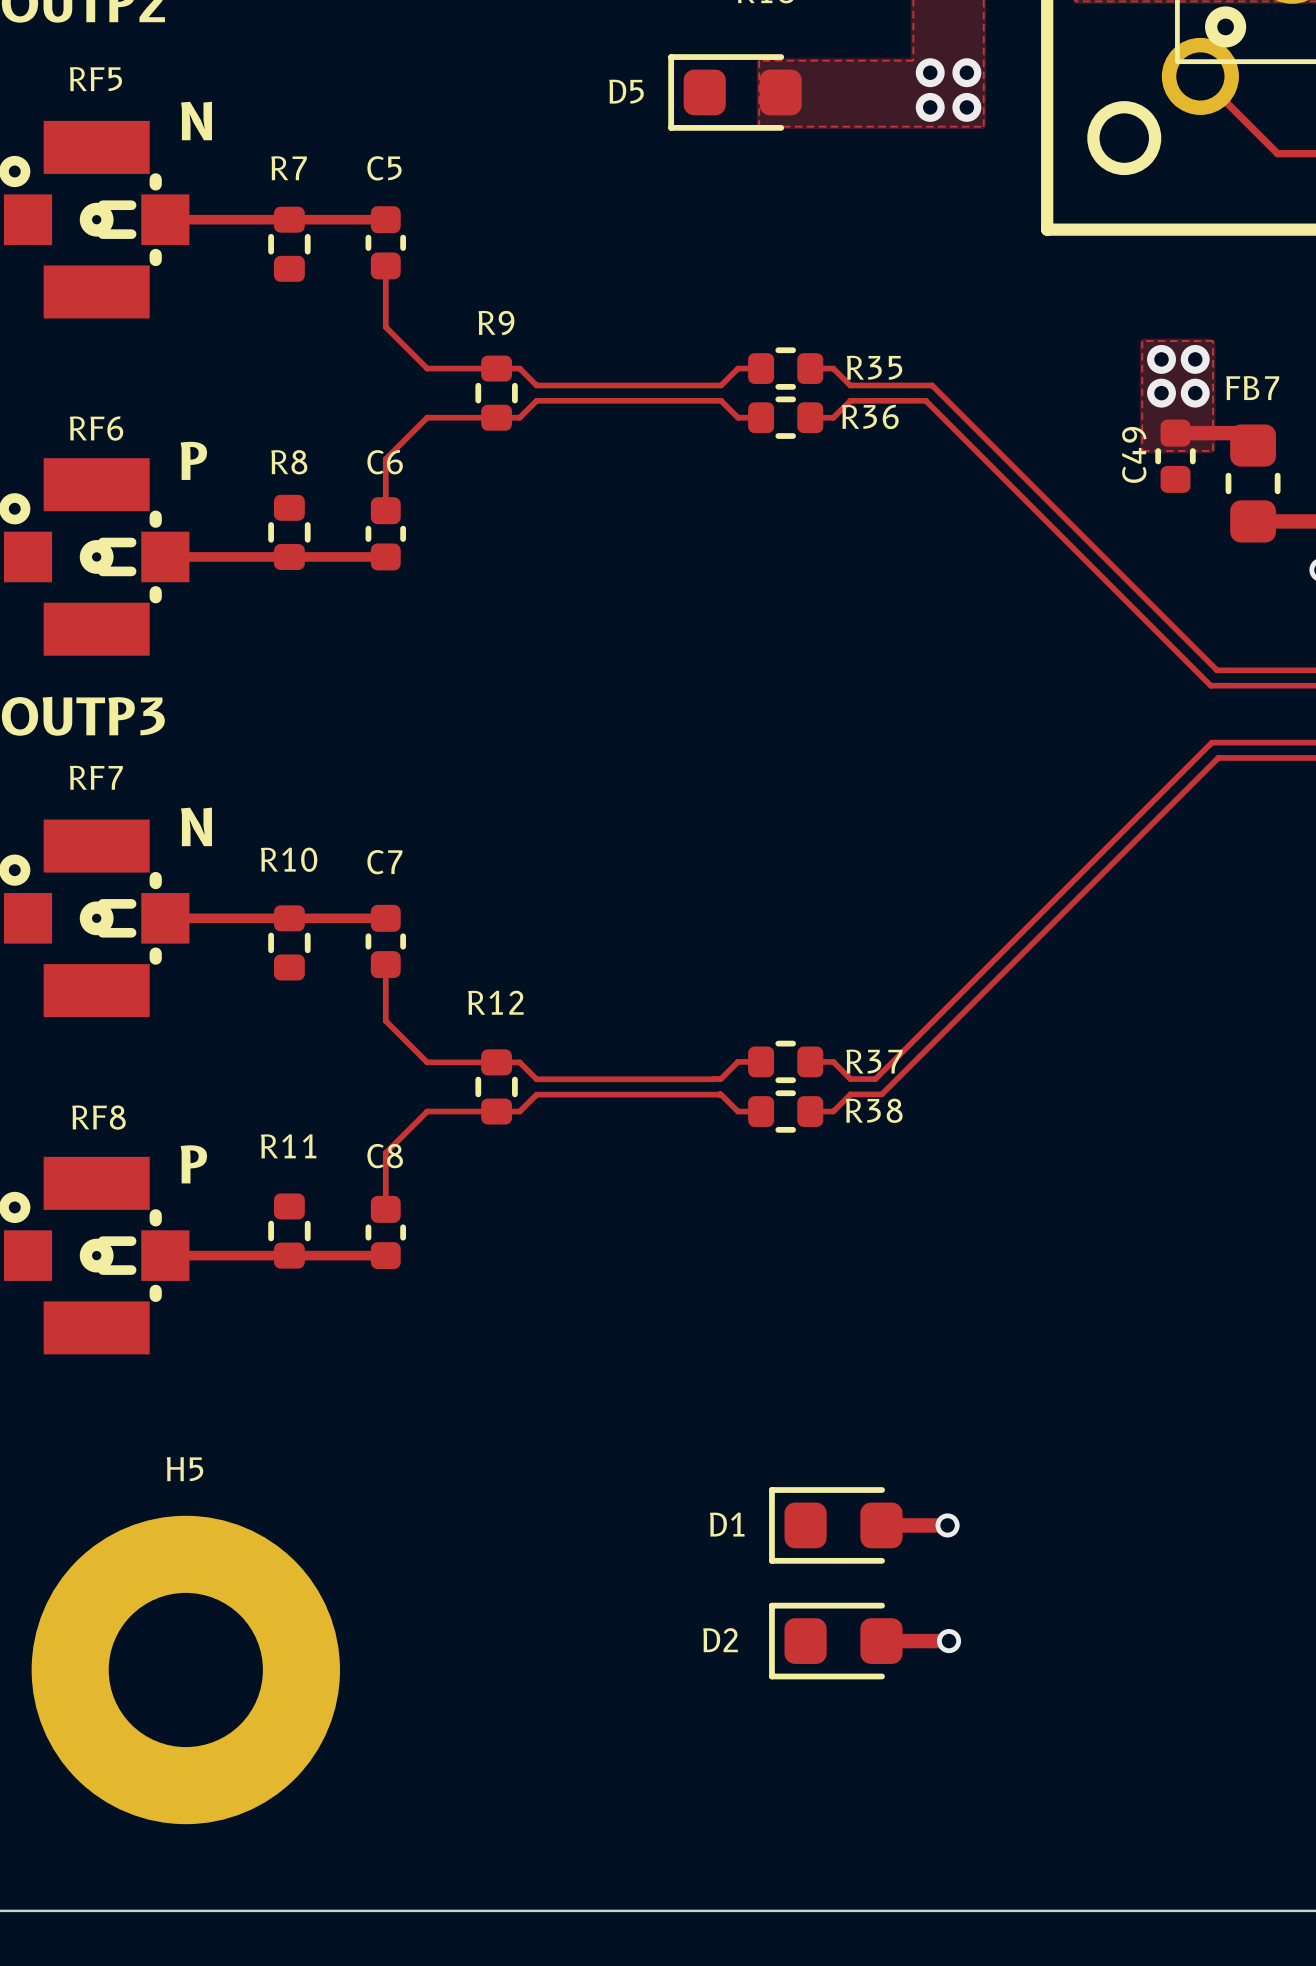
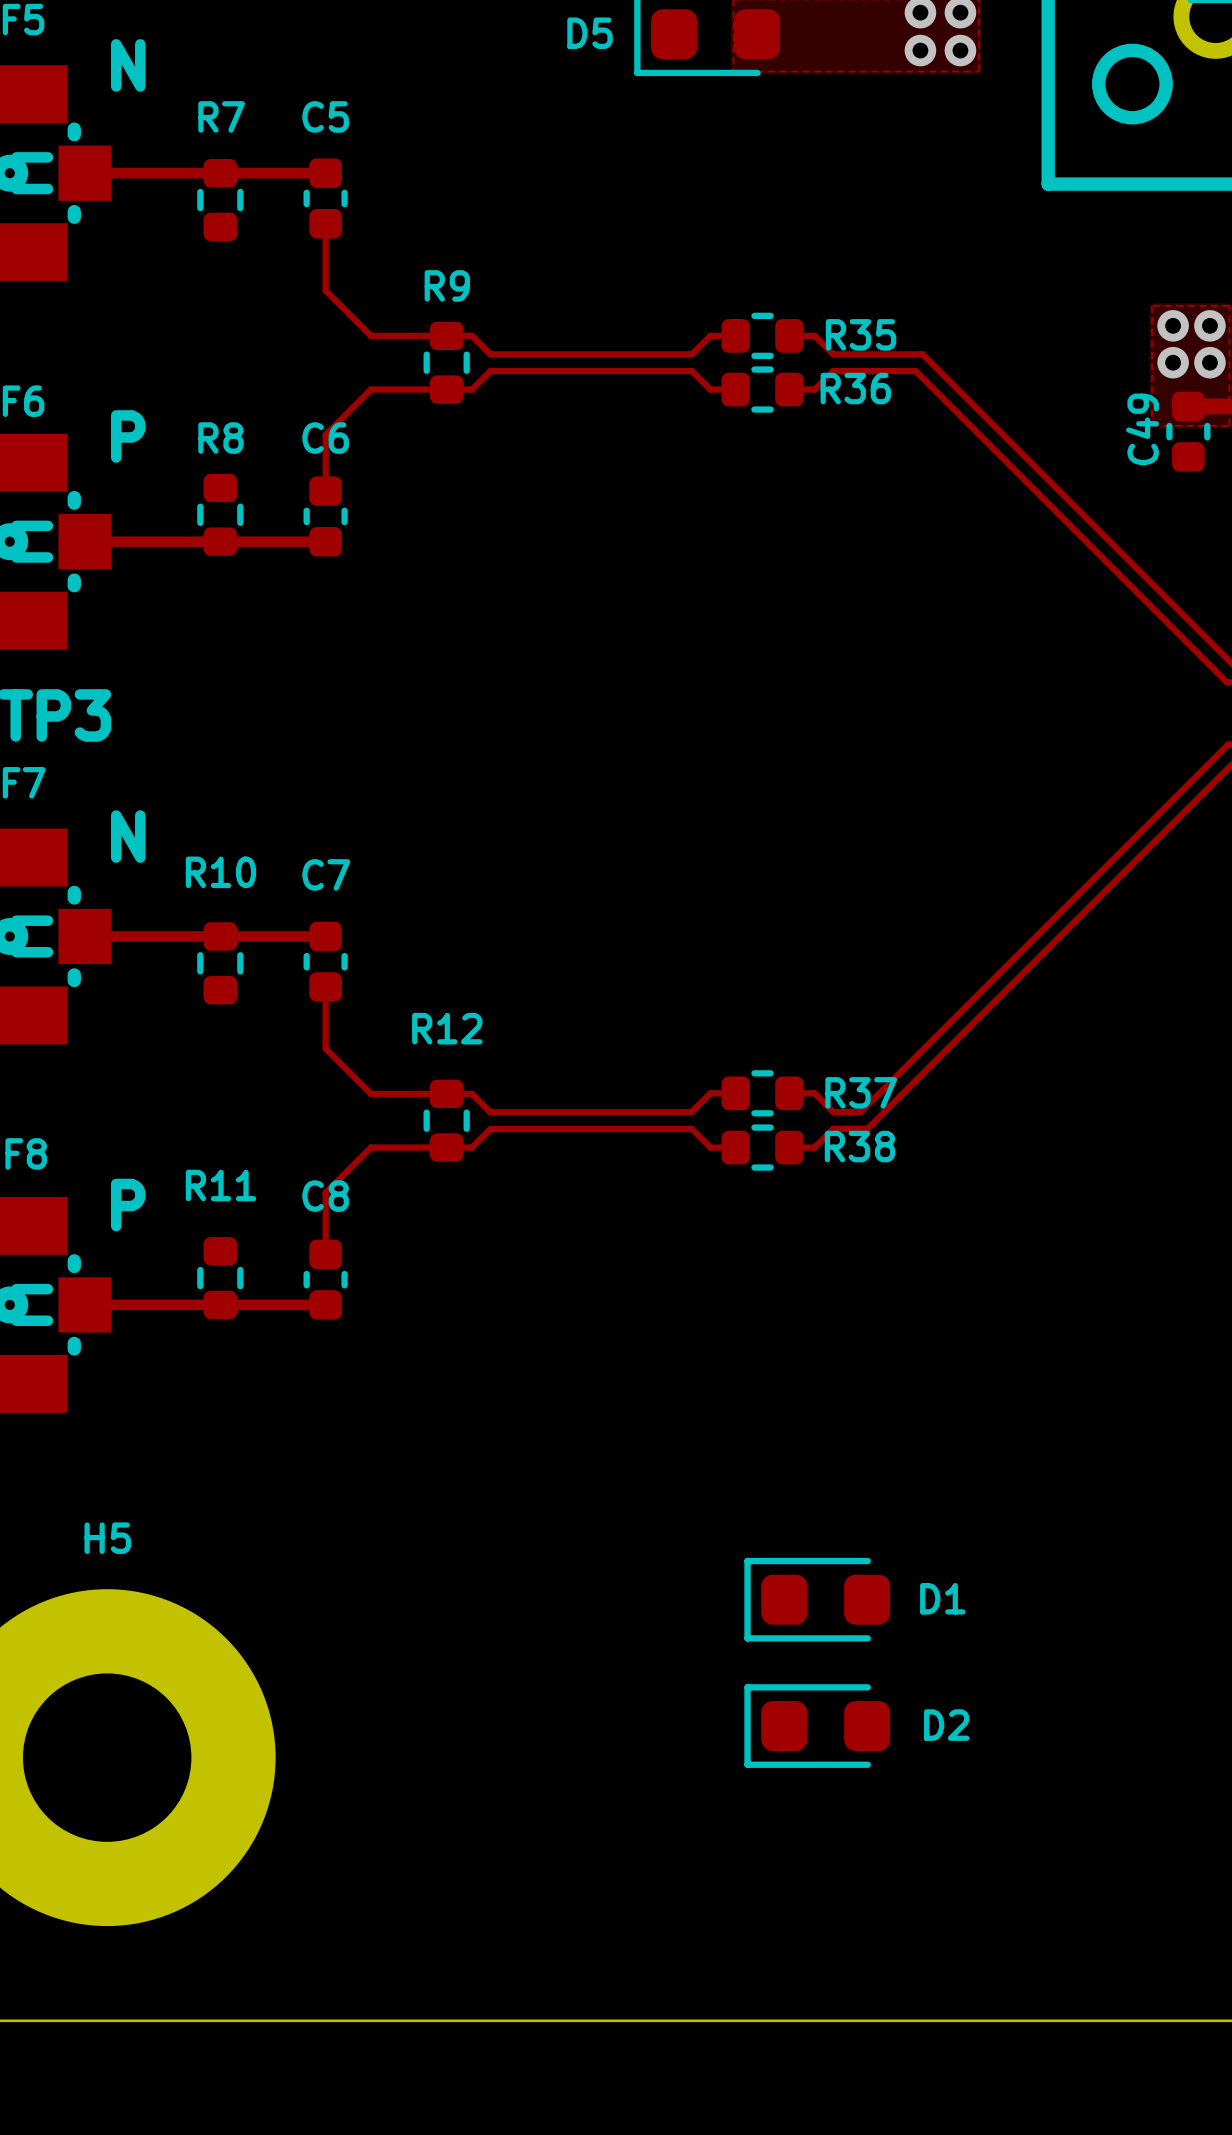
D1 name position: D1 (727, 1524) -> D1 (942, 1598)
track: (881, 1525) (947, 1525) -> none
via: (947, 1525) -> none
D2 name position: D2 (720, 1640) -> D2 (946, 1725)
track: (881, 1641) (949, 1641) -> none
via: (949, 1641) -> none

